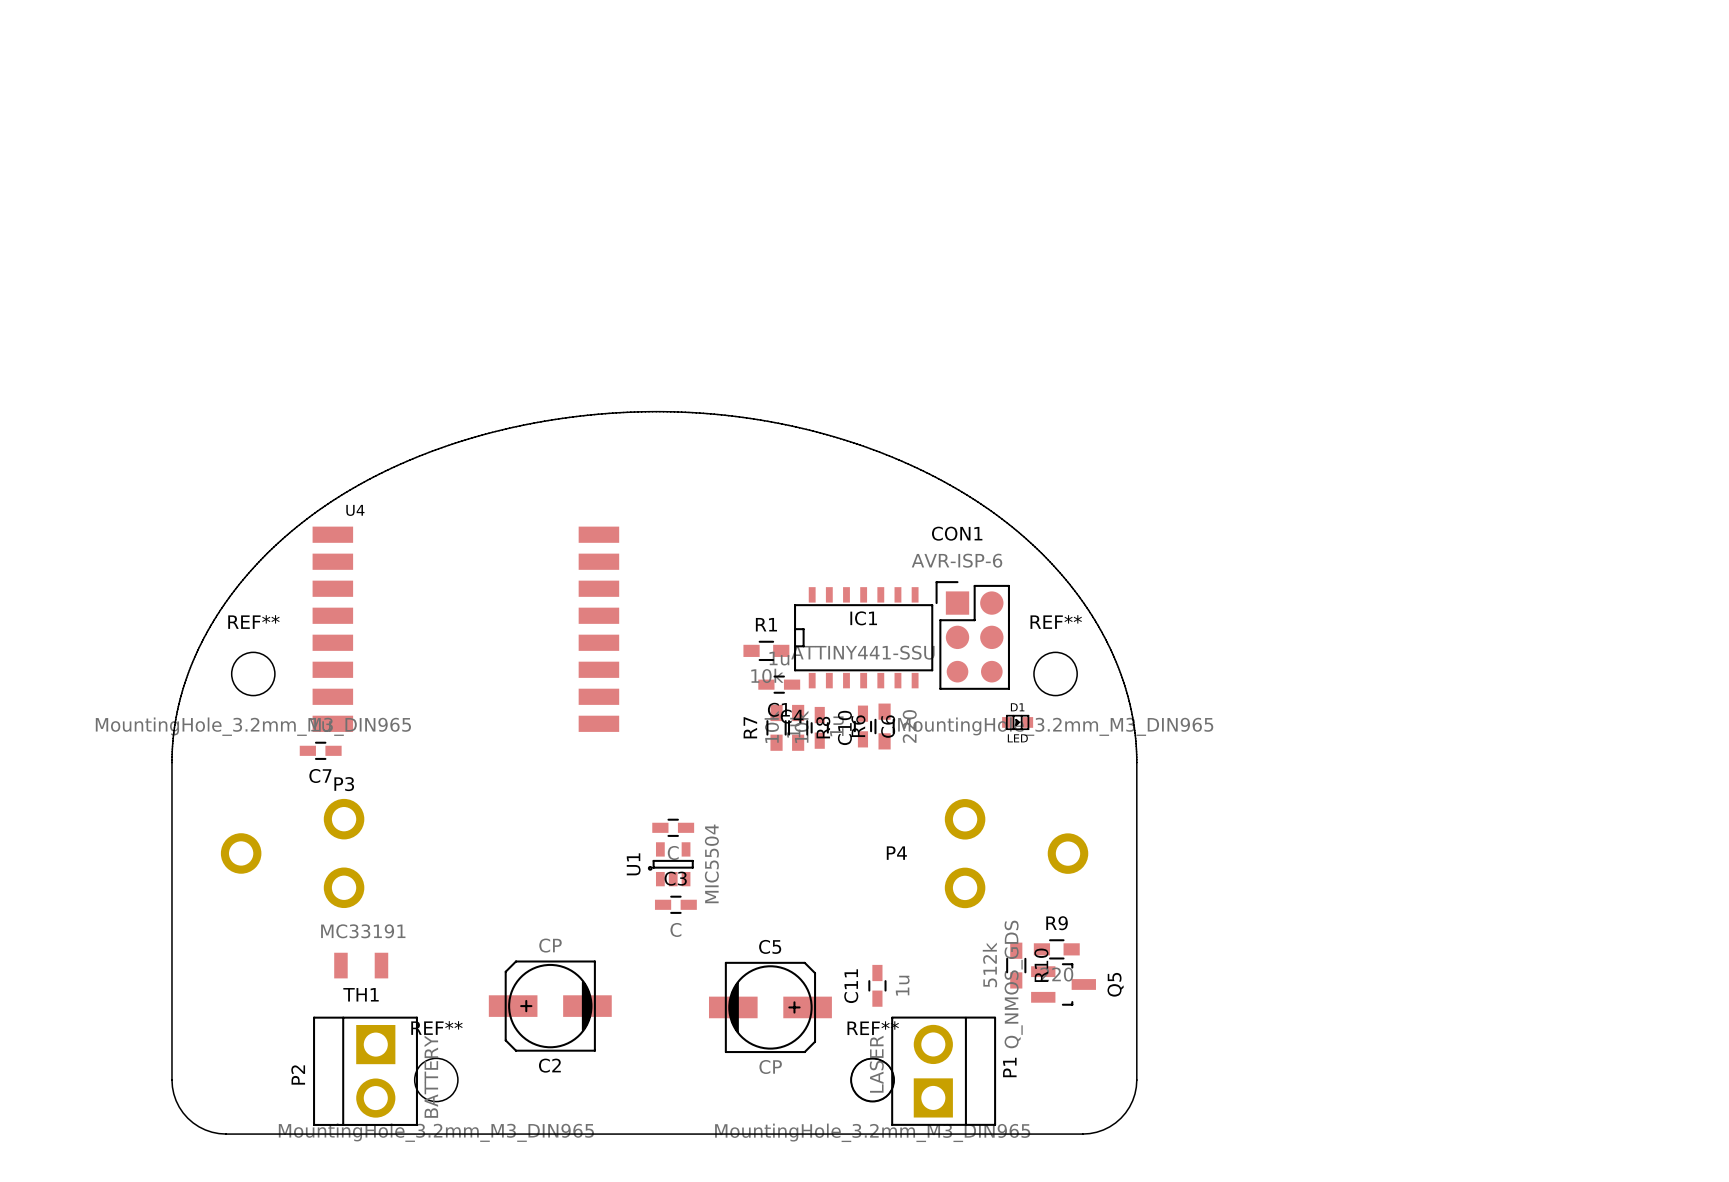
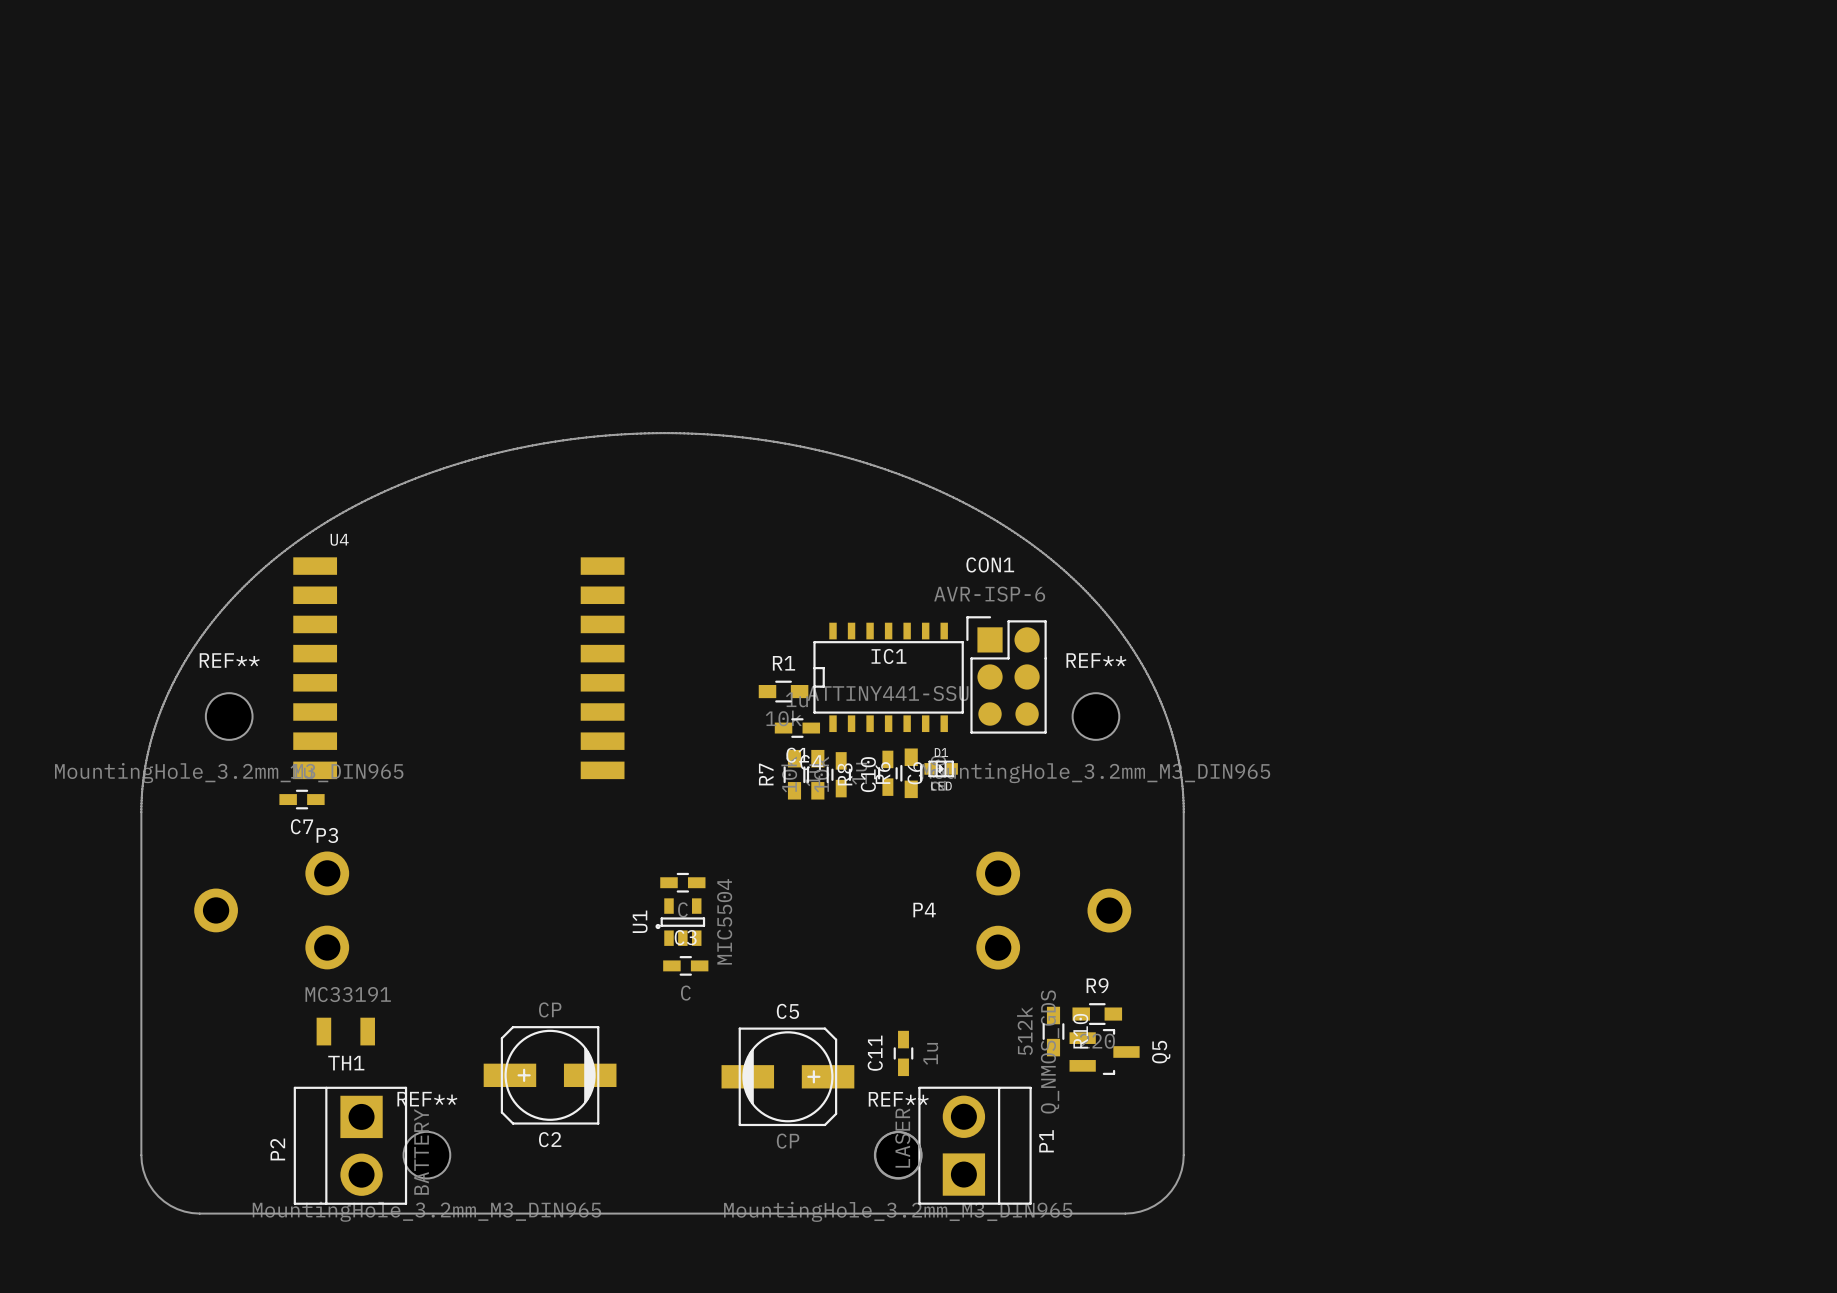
D1 position: (1017, 722) -> (941, 768)

